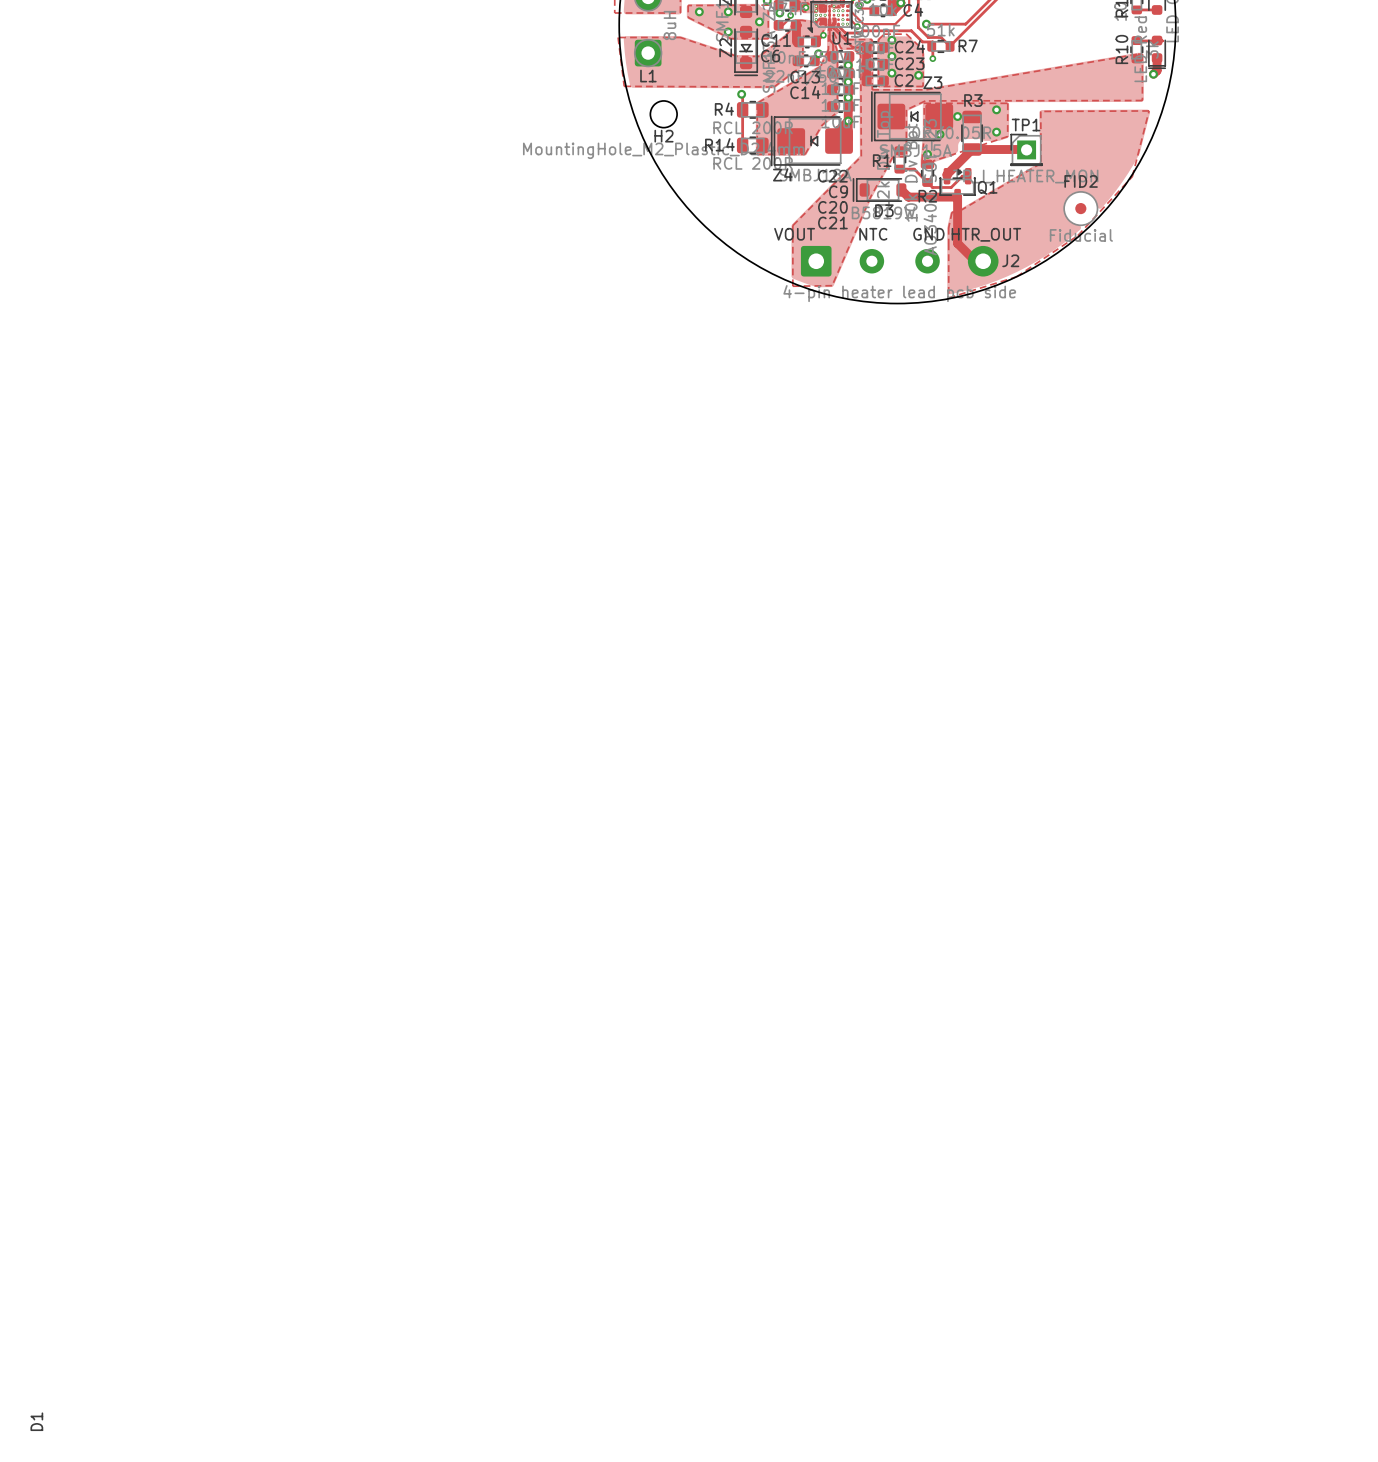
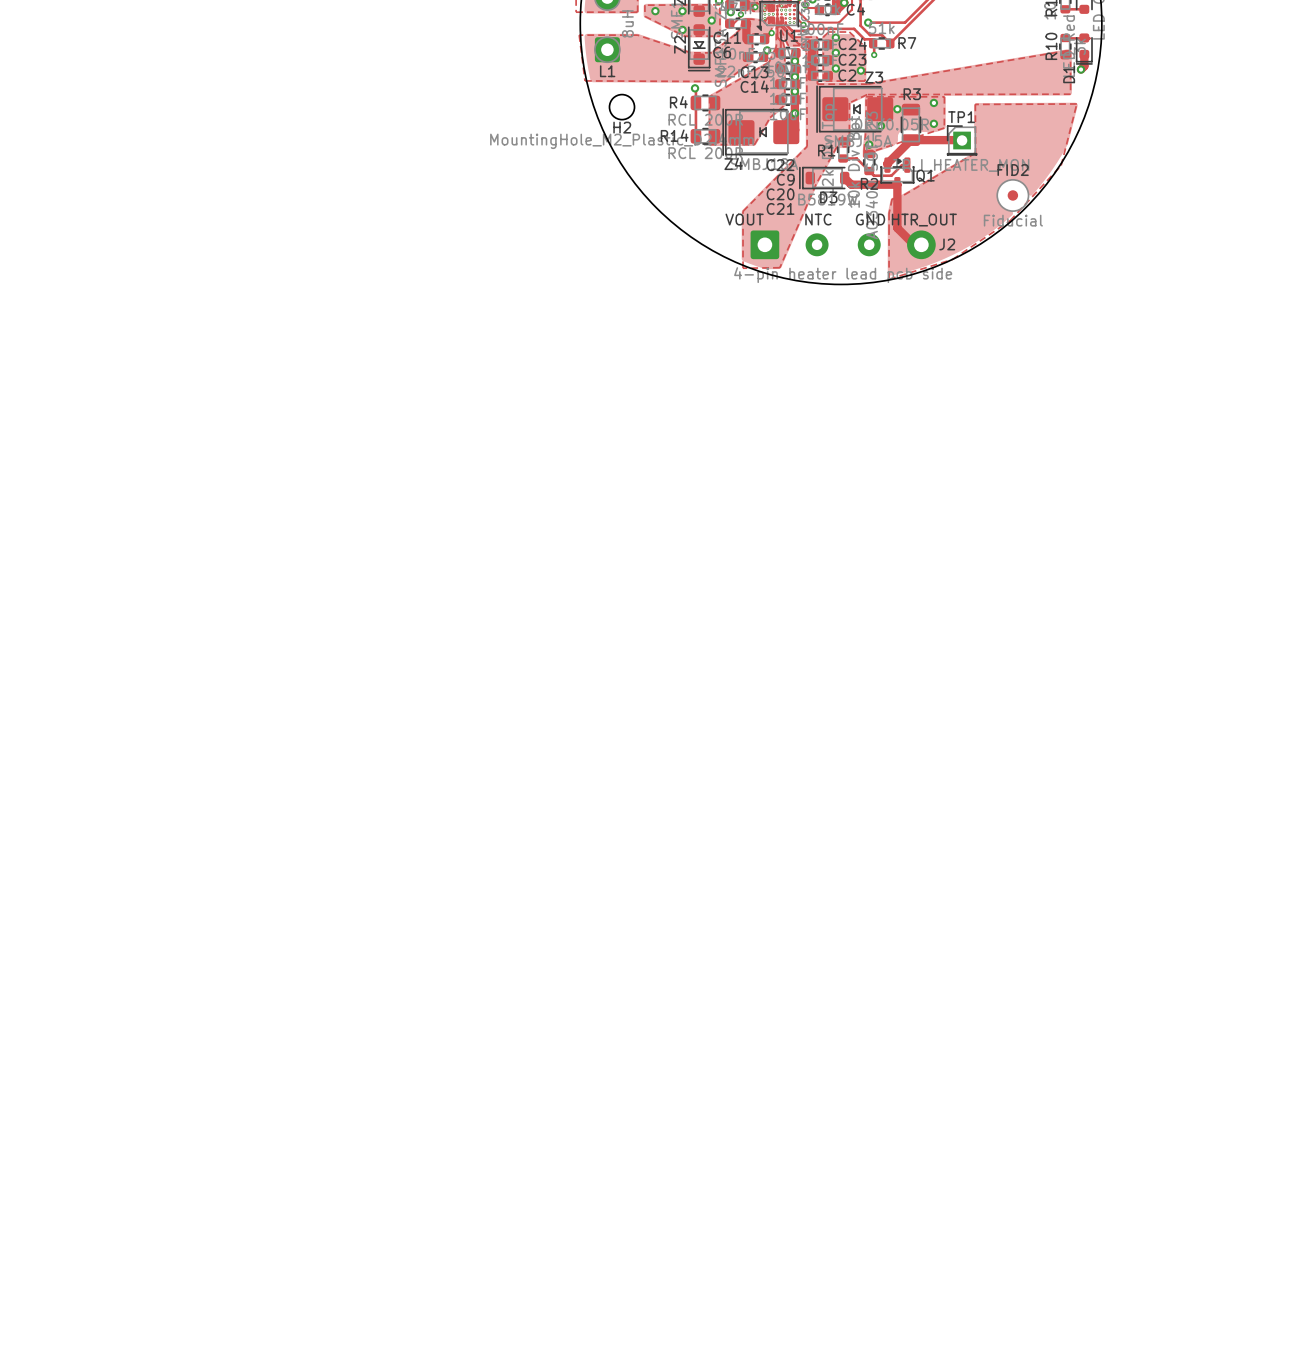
D1 name position: D1 (36, 1421) -> D1 (1069, 74)

